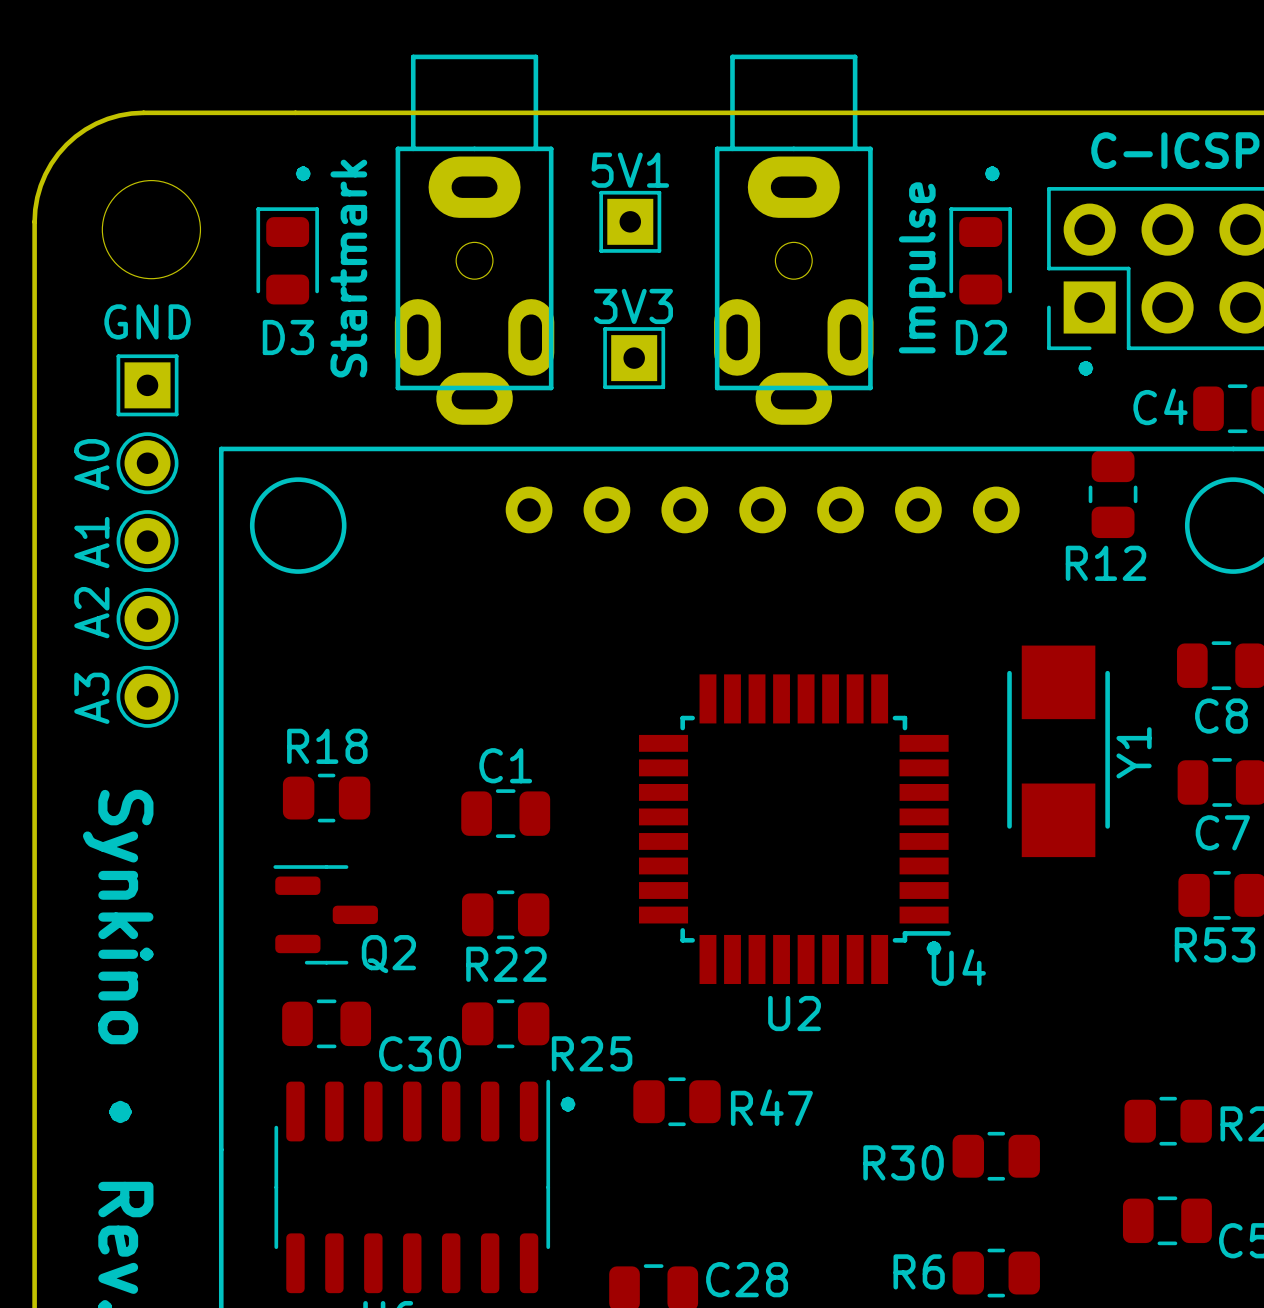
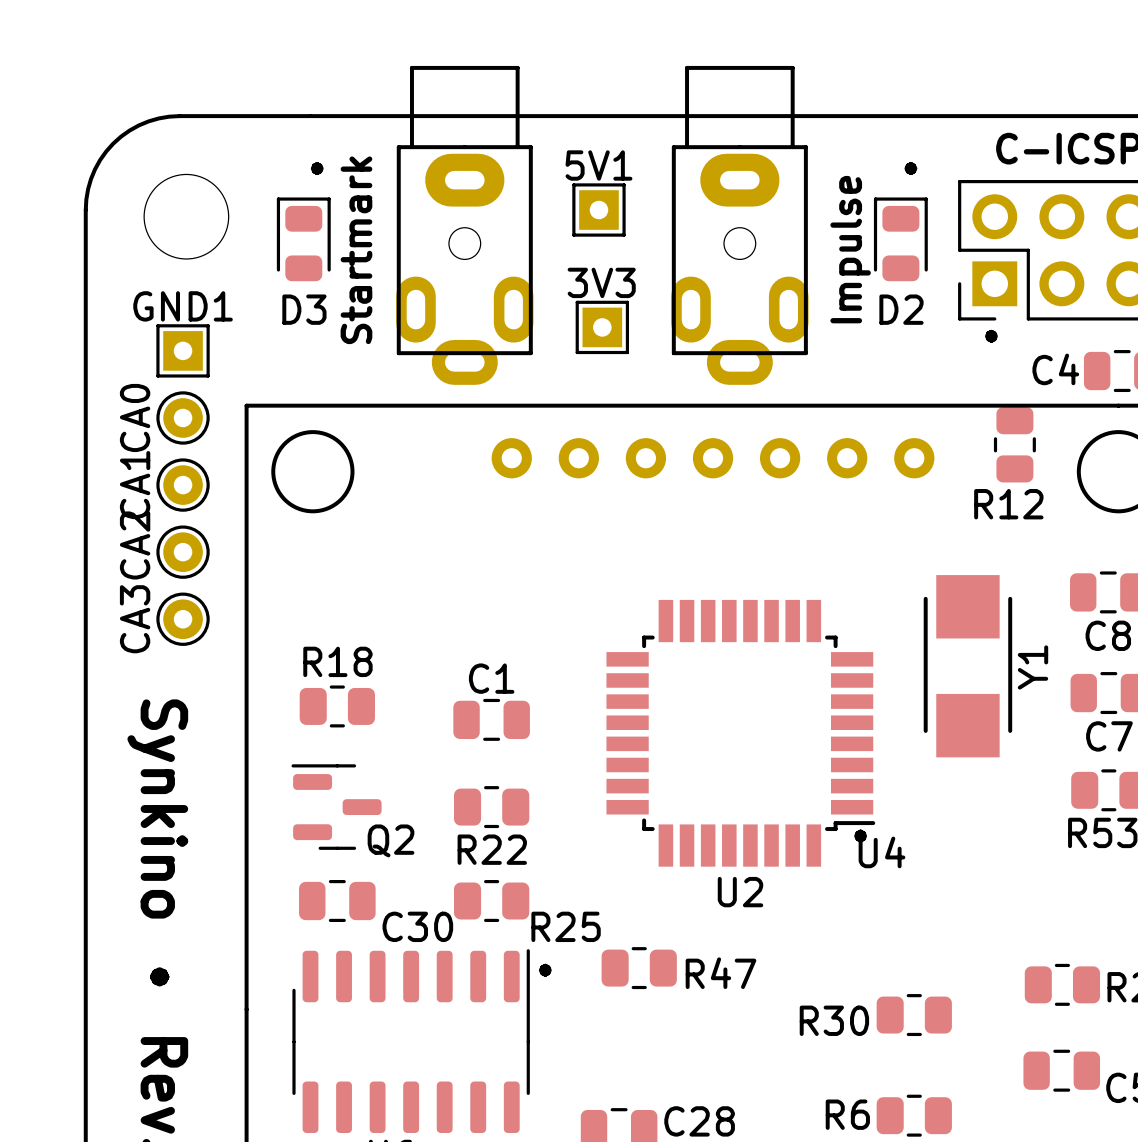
GND name: GND (147, 321) -> GND1 (183, 306)
A0 name: A0 (91, 464) -> CA0 (135, 417)
A1 name: A1 (91, 542) -> CA1 (135, 485)
A2 name: A2 (91, 612) -> CA2 (135, 545)
A3 name: A3 (91, 698) -> CA3 (135, 619)

